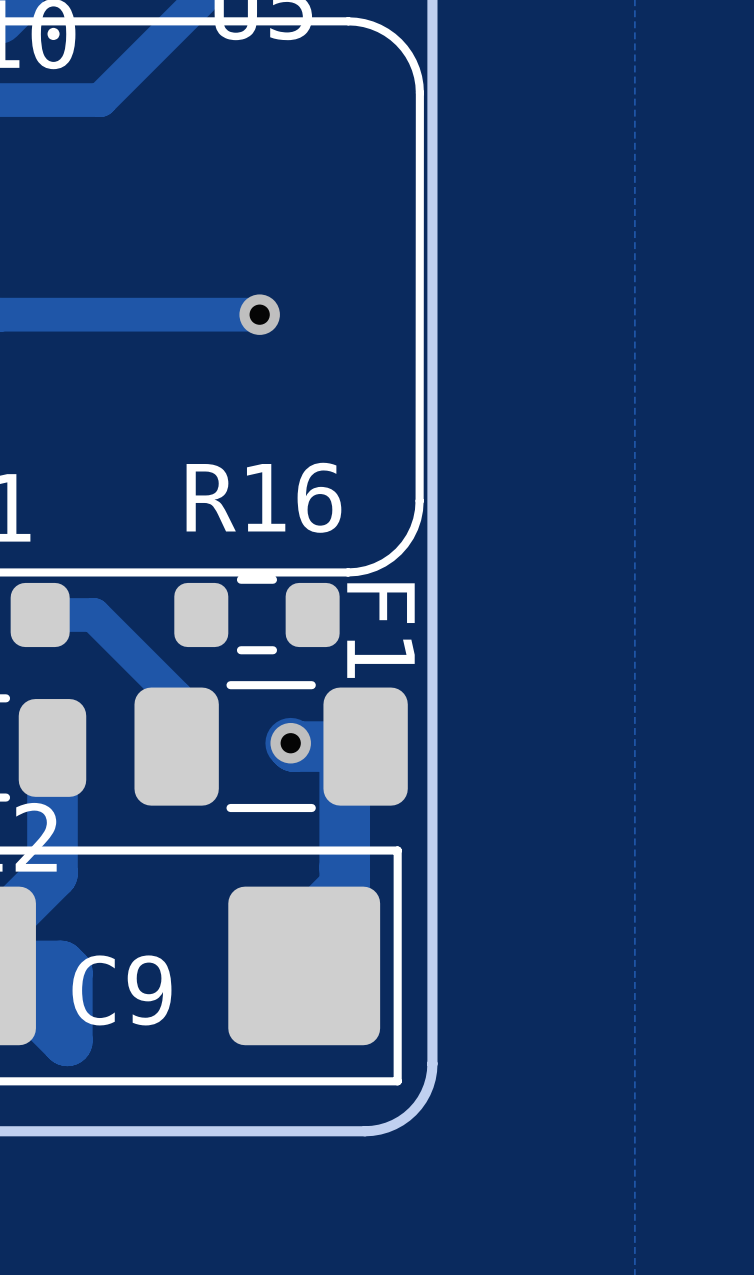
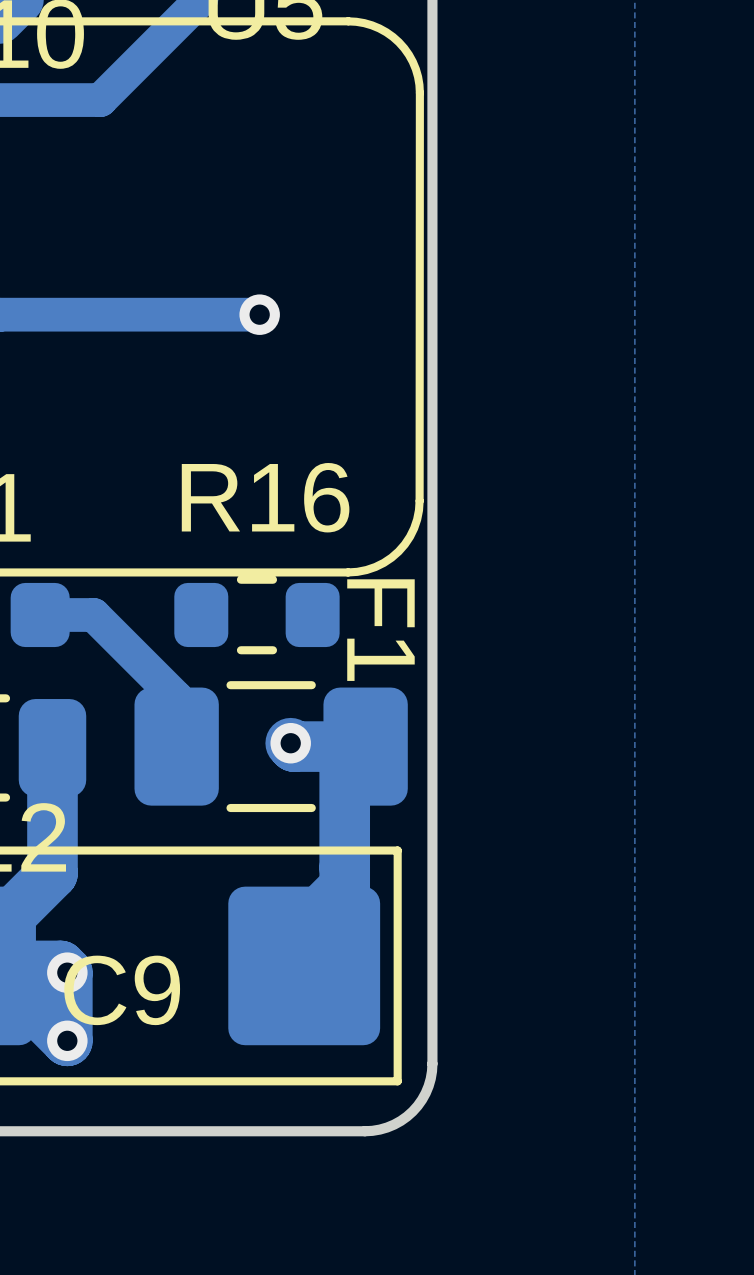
via: none -> (67, 972)
via: none -> (67, 1040)

